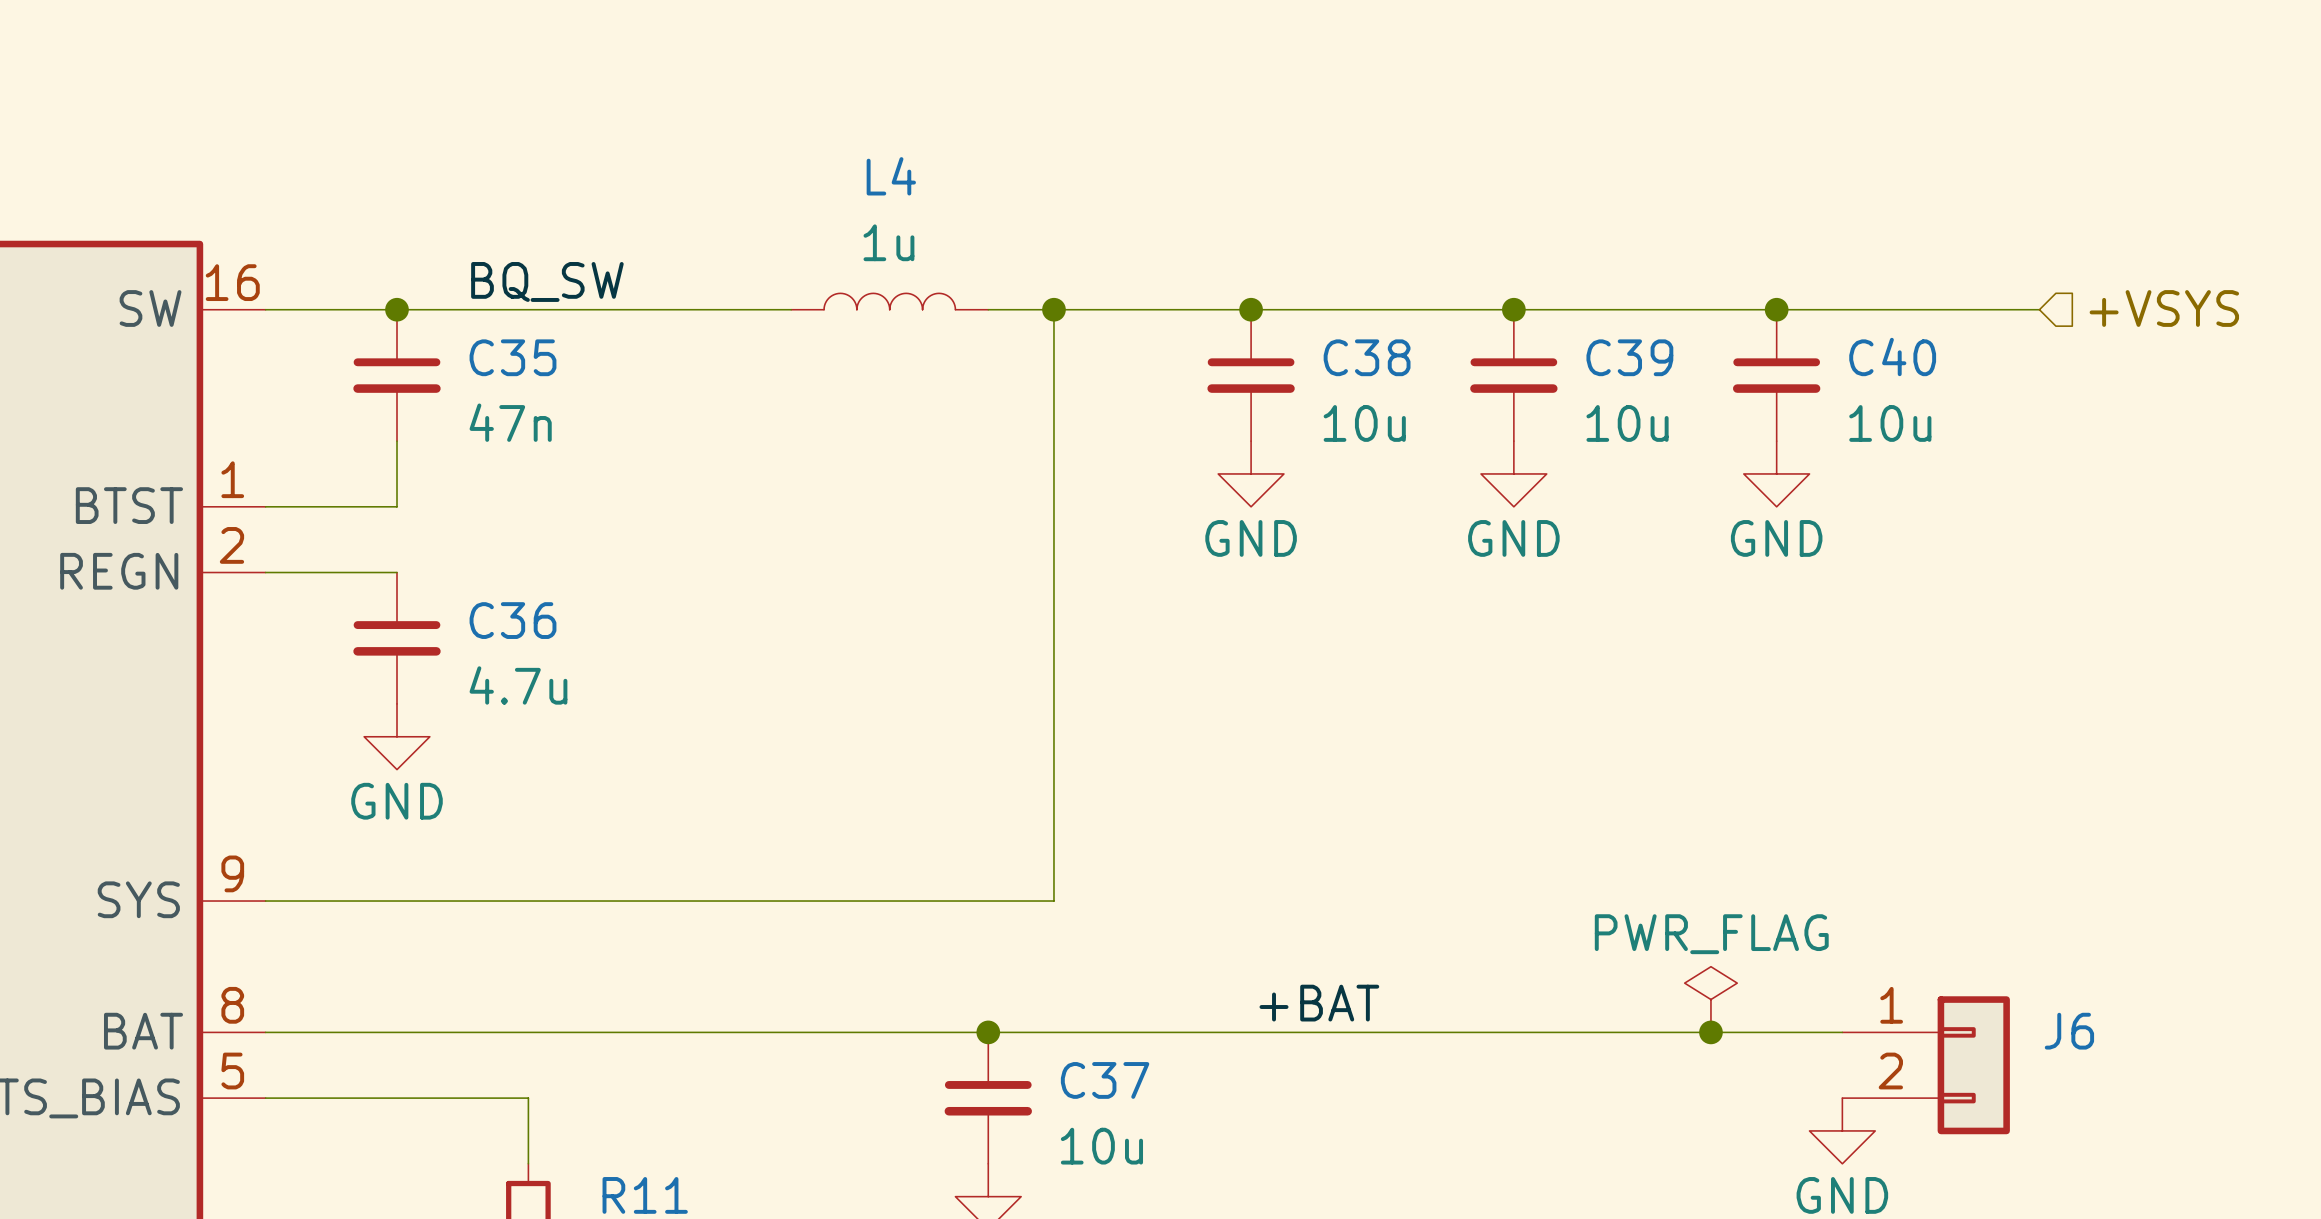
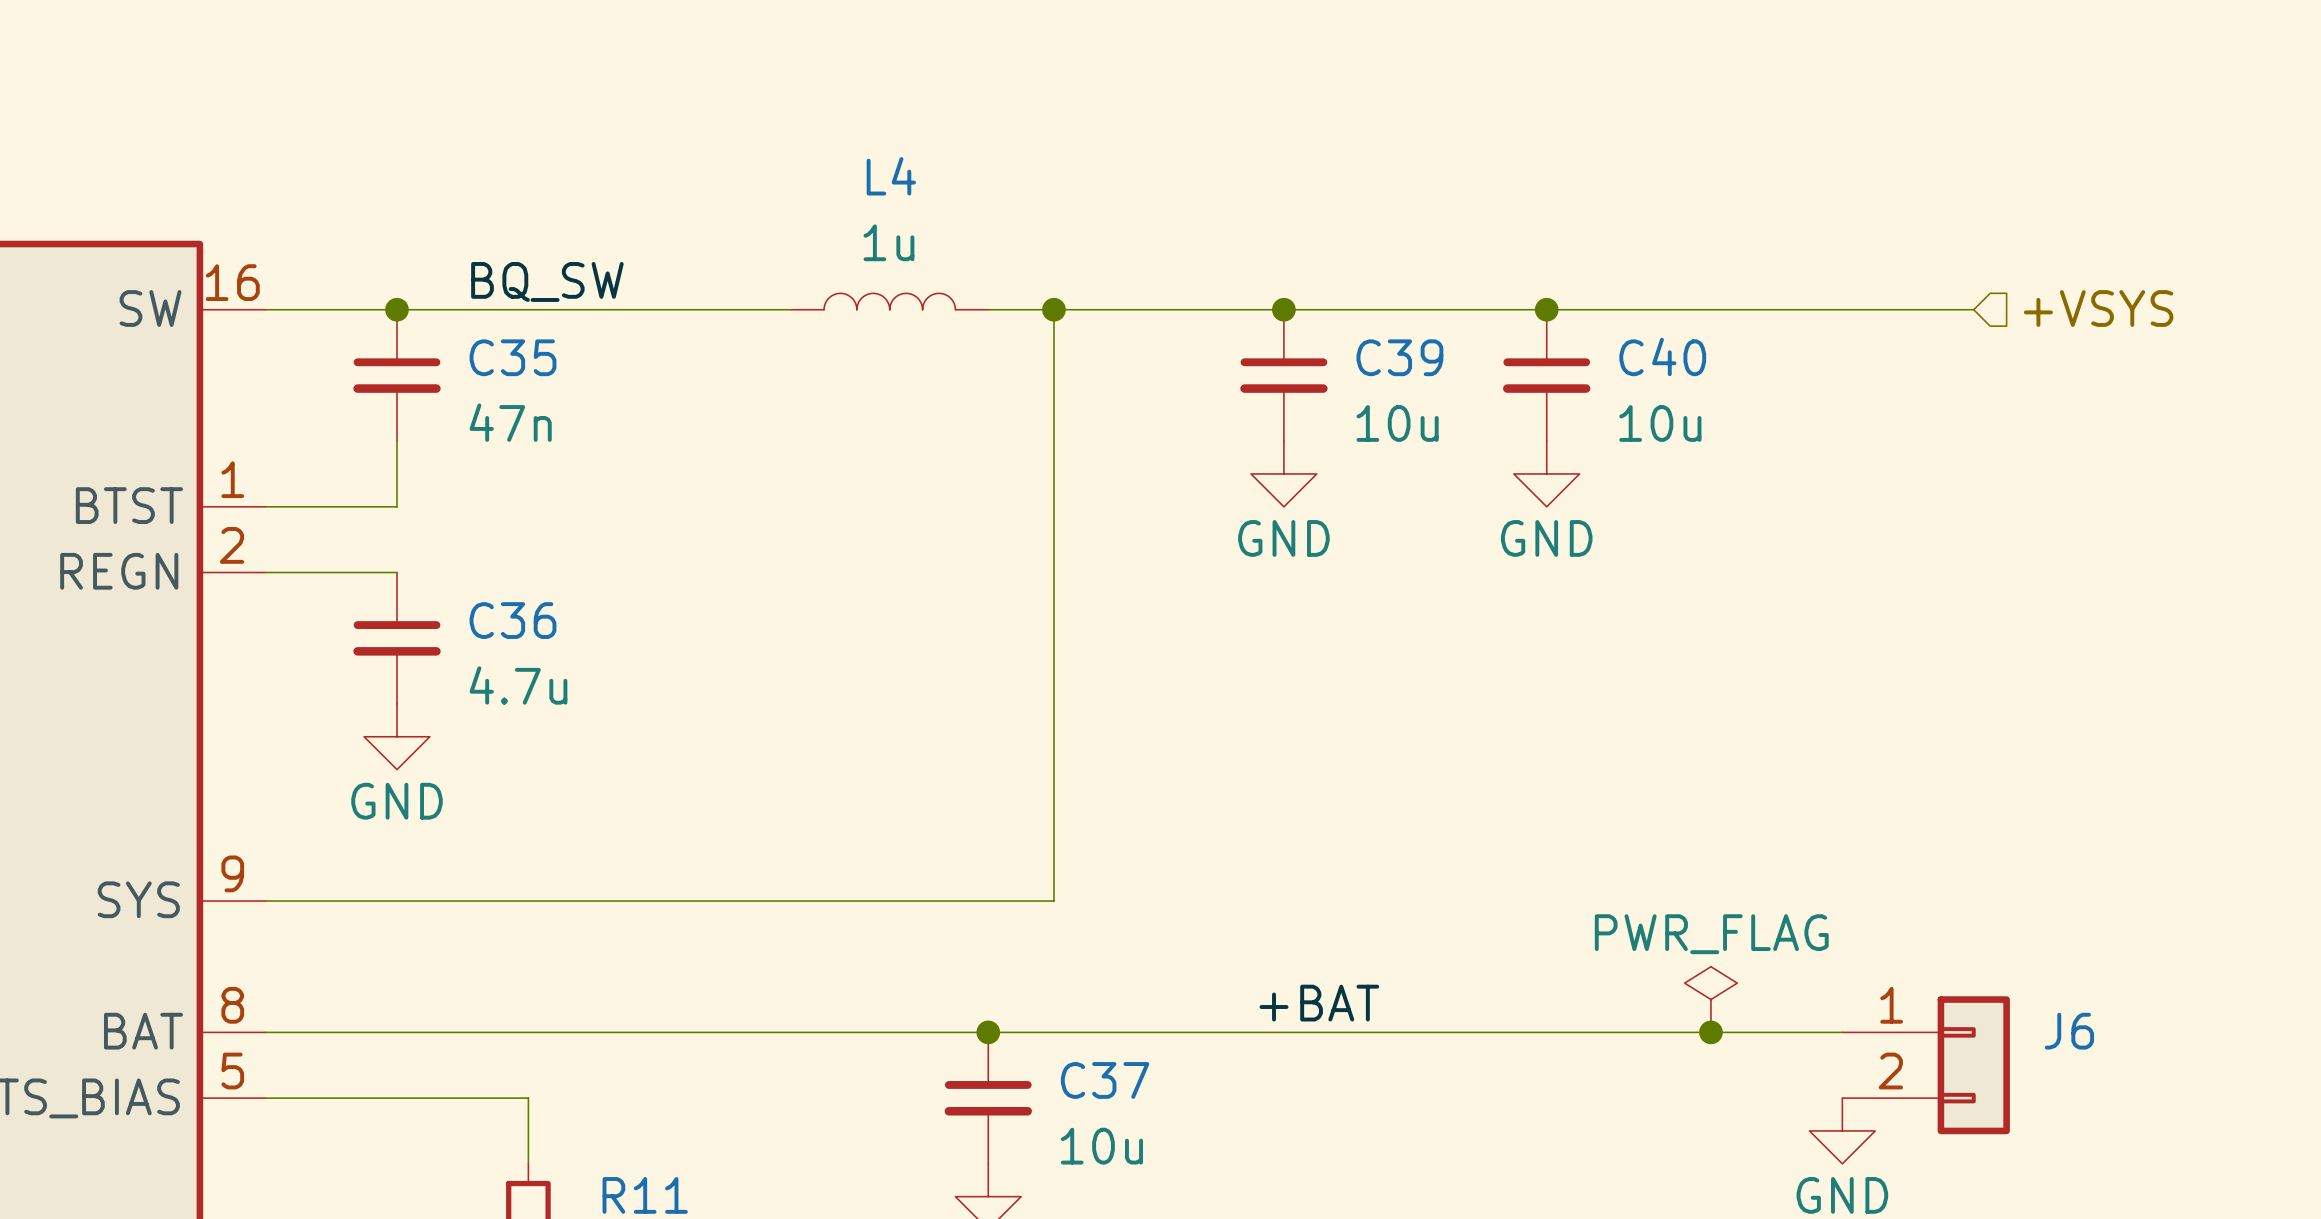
hierarchical label position: +VSYS (2164, 308) -> +VSYS (2098, 308)
junction position: (1251, 309) -> (1283, 309)
junction position: (1513, 309) -> (1546, 309)
junction: (1776, 309) -> none
wire: (1973, 309) (2039, 309) -> none
C38: 10u (1251, 375) -> none
C39 position: (1513, 375) -> (1283, 375)
C40 position: (1776, 375) -> (1546, 375)
power symbol position: GND (1251, 473) -> GND (1283, 473)
power symbol position: GND (1513, 473) -> GND (1546, 473)
power symbol: GND (1776, 473) -> none

